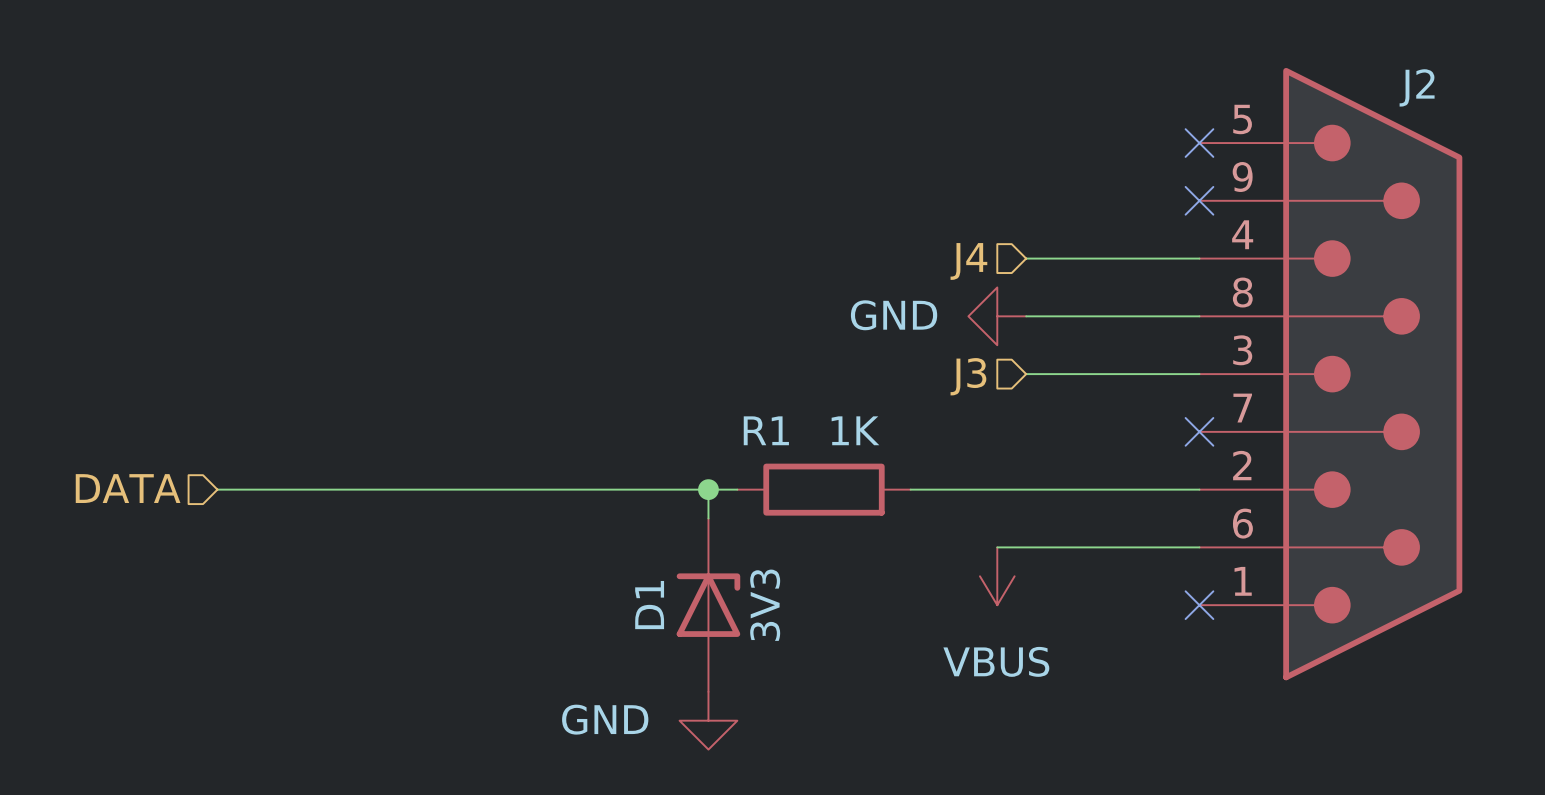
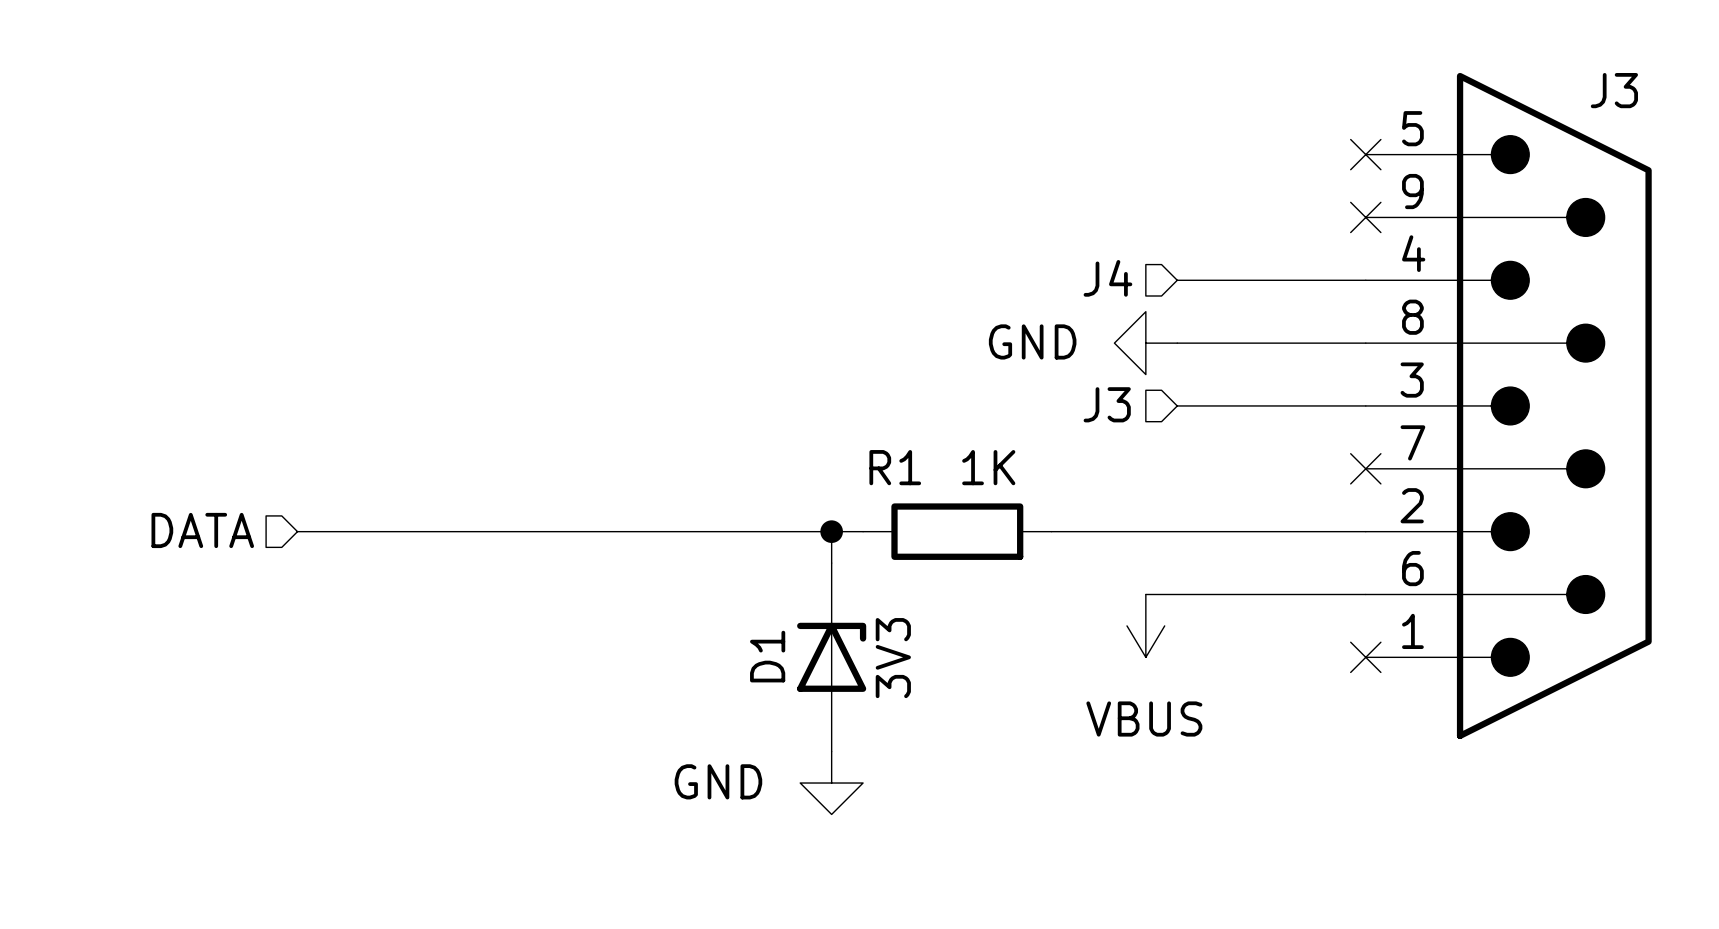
J2 name: J2 (1417, 87) -> J3 (1614, 90)

